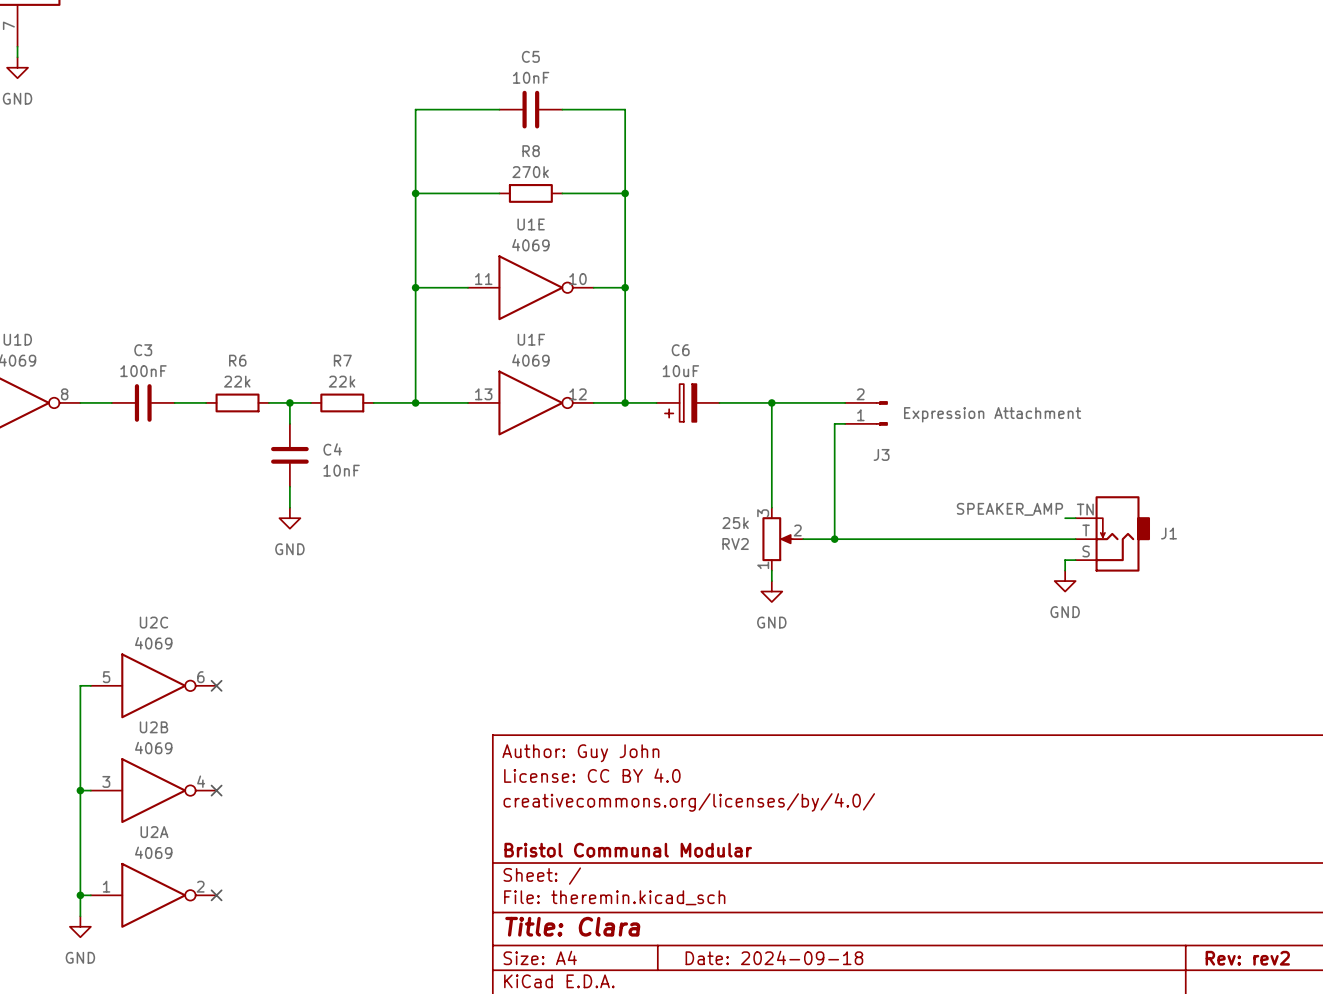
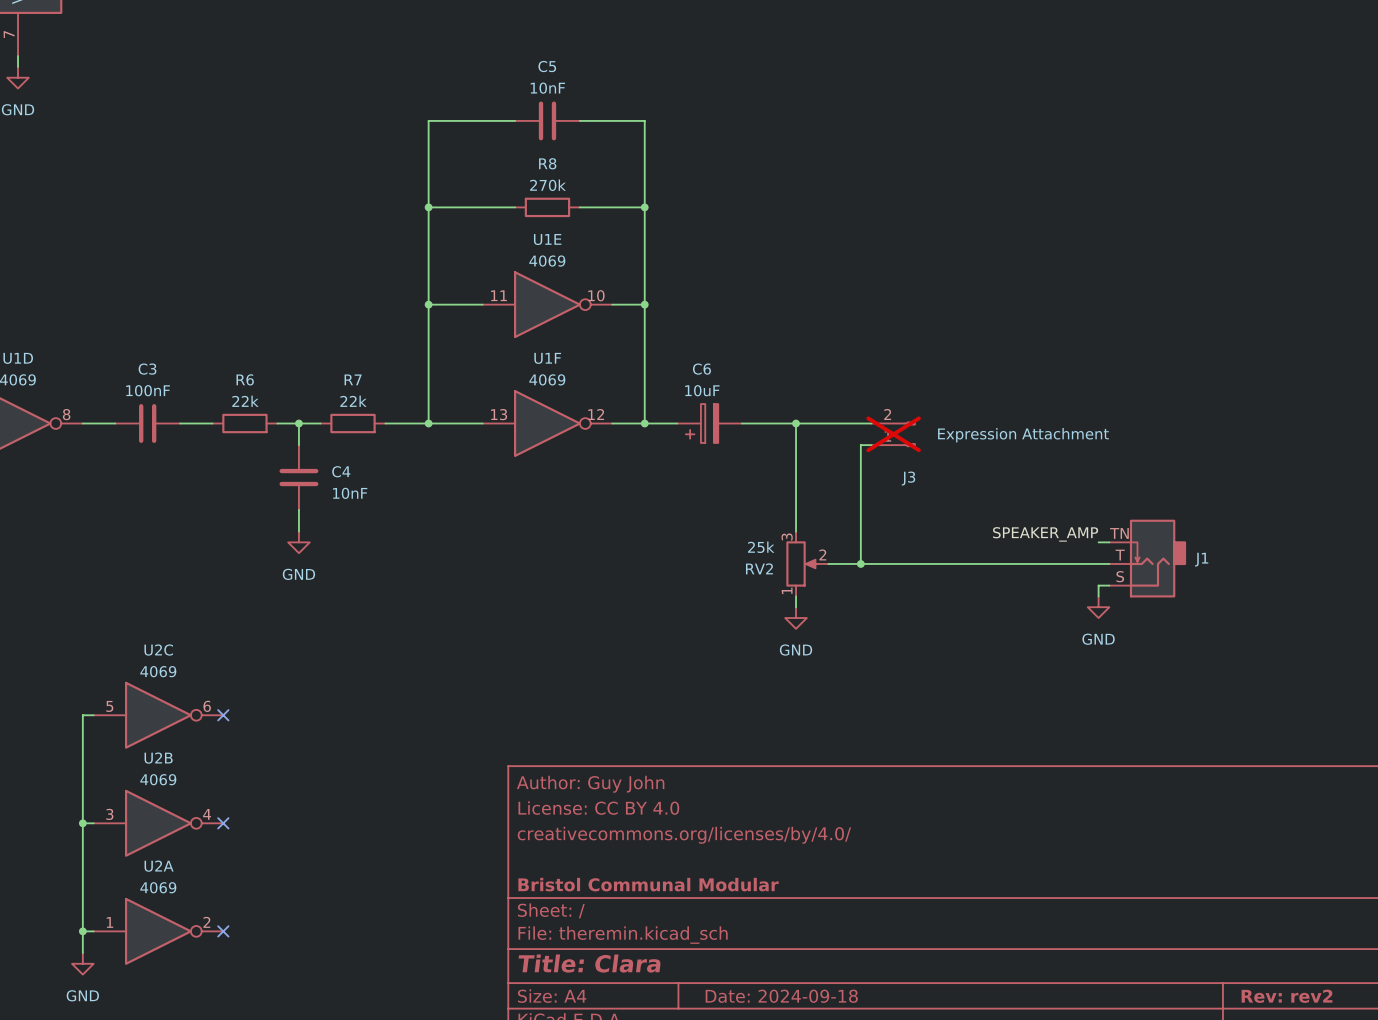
J3 do-not-place cross: none -> (893, 434)

